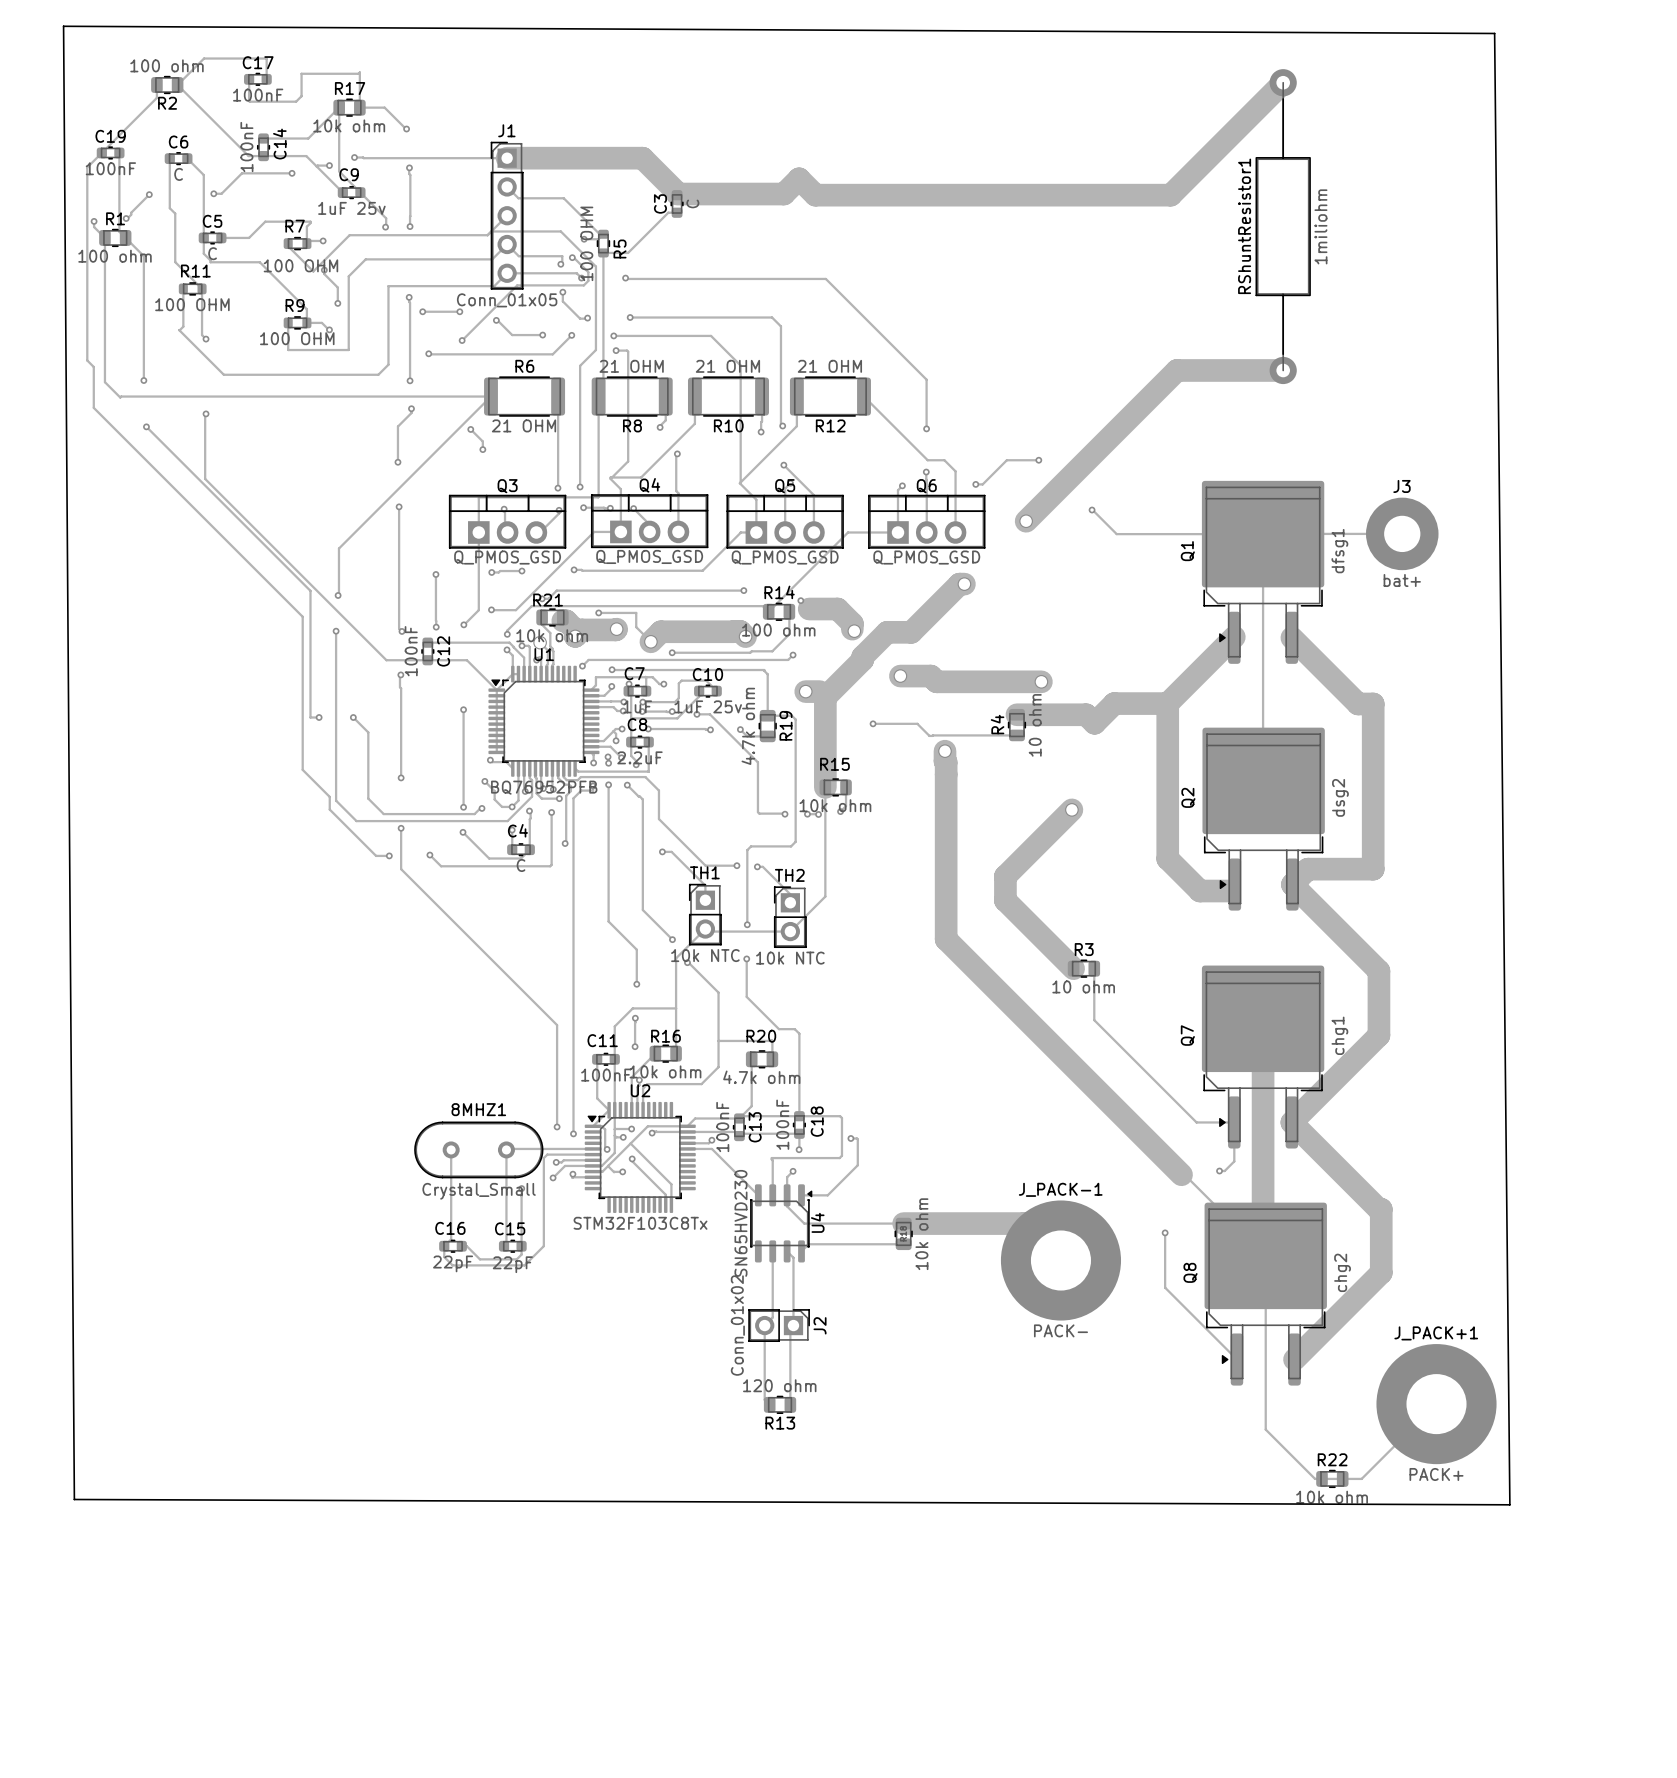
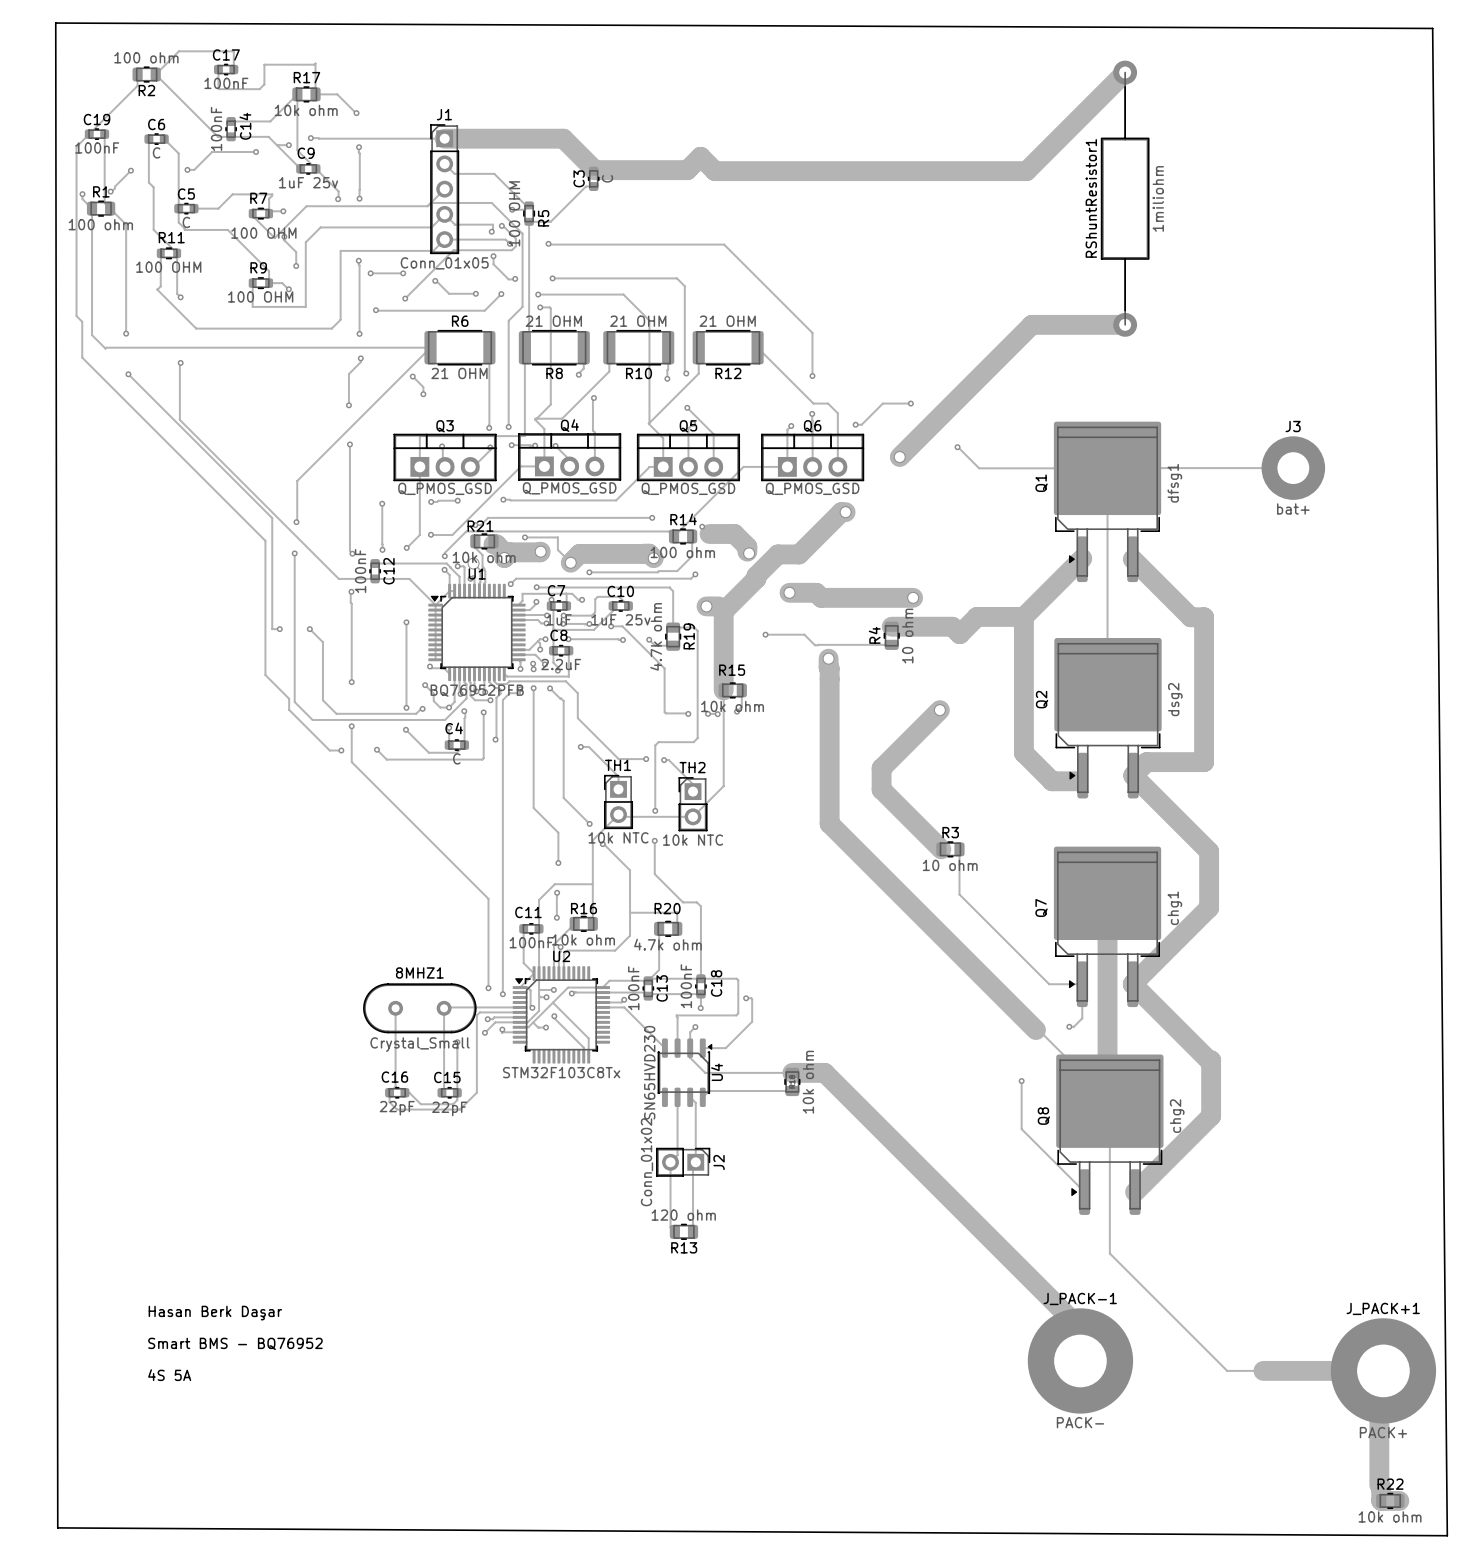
board edge: (63, 26) (74, 1499) (1509, 1504) (1494, 33) (63, 26) -> (55, 23) (57, 1527) (1447, 1535) (1432, 28) (55, 23)
J3 position: (1402, 533) -> (1293, 468)
track: (940, 1223) (1024, 1223) (1060, 1260) -> (824, 1072) (1080, 1328) (1080, 1360)
J_PACK-1 position: (1060, 1260) -> (1080, 1360)
track: (1436, 1404) (1361, 1478) (1315, 1478) -> (1399, 1500) (1381, 1500) (1381, 1487) (1379, 1485) (1379, 1375) (1383, 1370) (1227, 1370) (1153, 1296)
J_PACK+1 position: (1436, 1404) -> (1383, 1370)
R22 position: (1332, 1478) -> (1390, 1500)
text: none -> Hasan Berk Daşar (215, 1313)
text: none -> Smart BMS - BQ76952 (235, 1343)
text: none -> 4S 5A (169, 1375)

